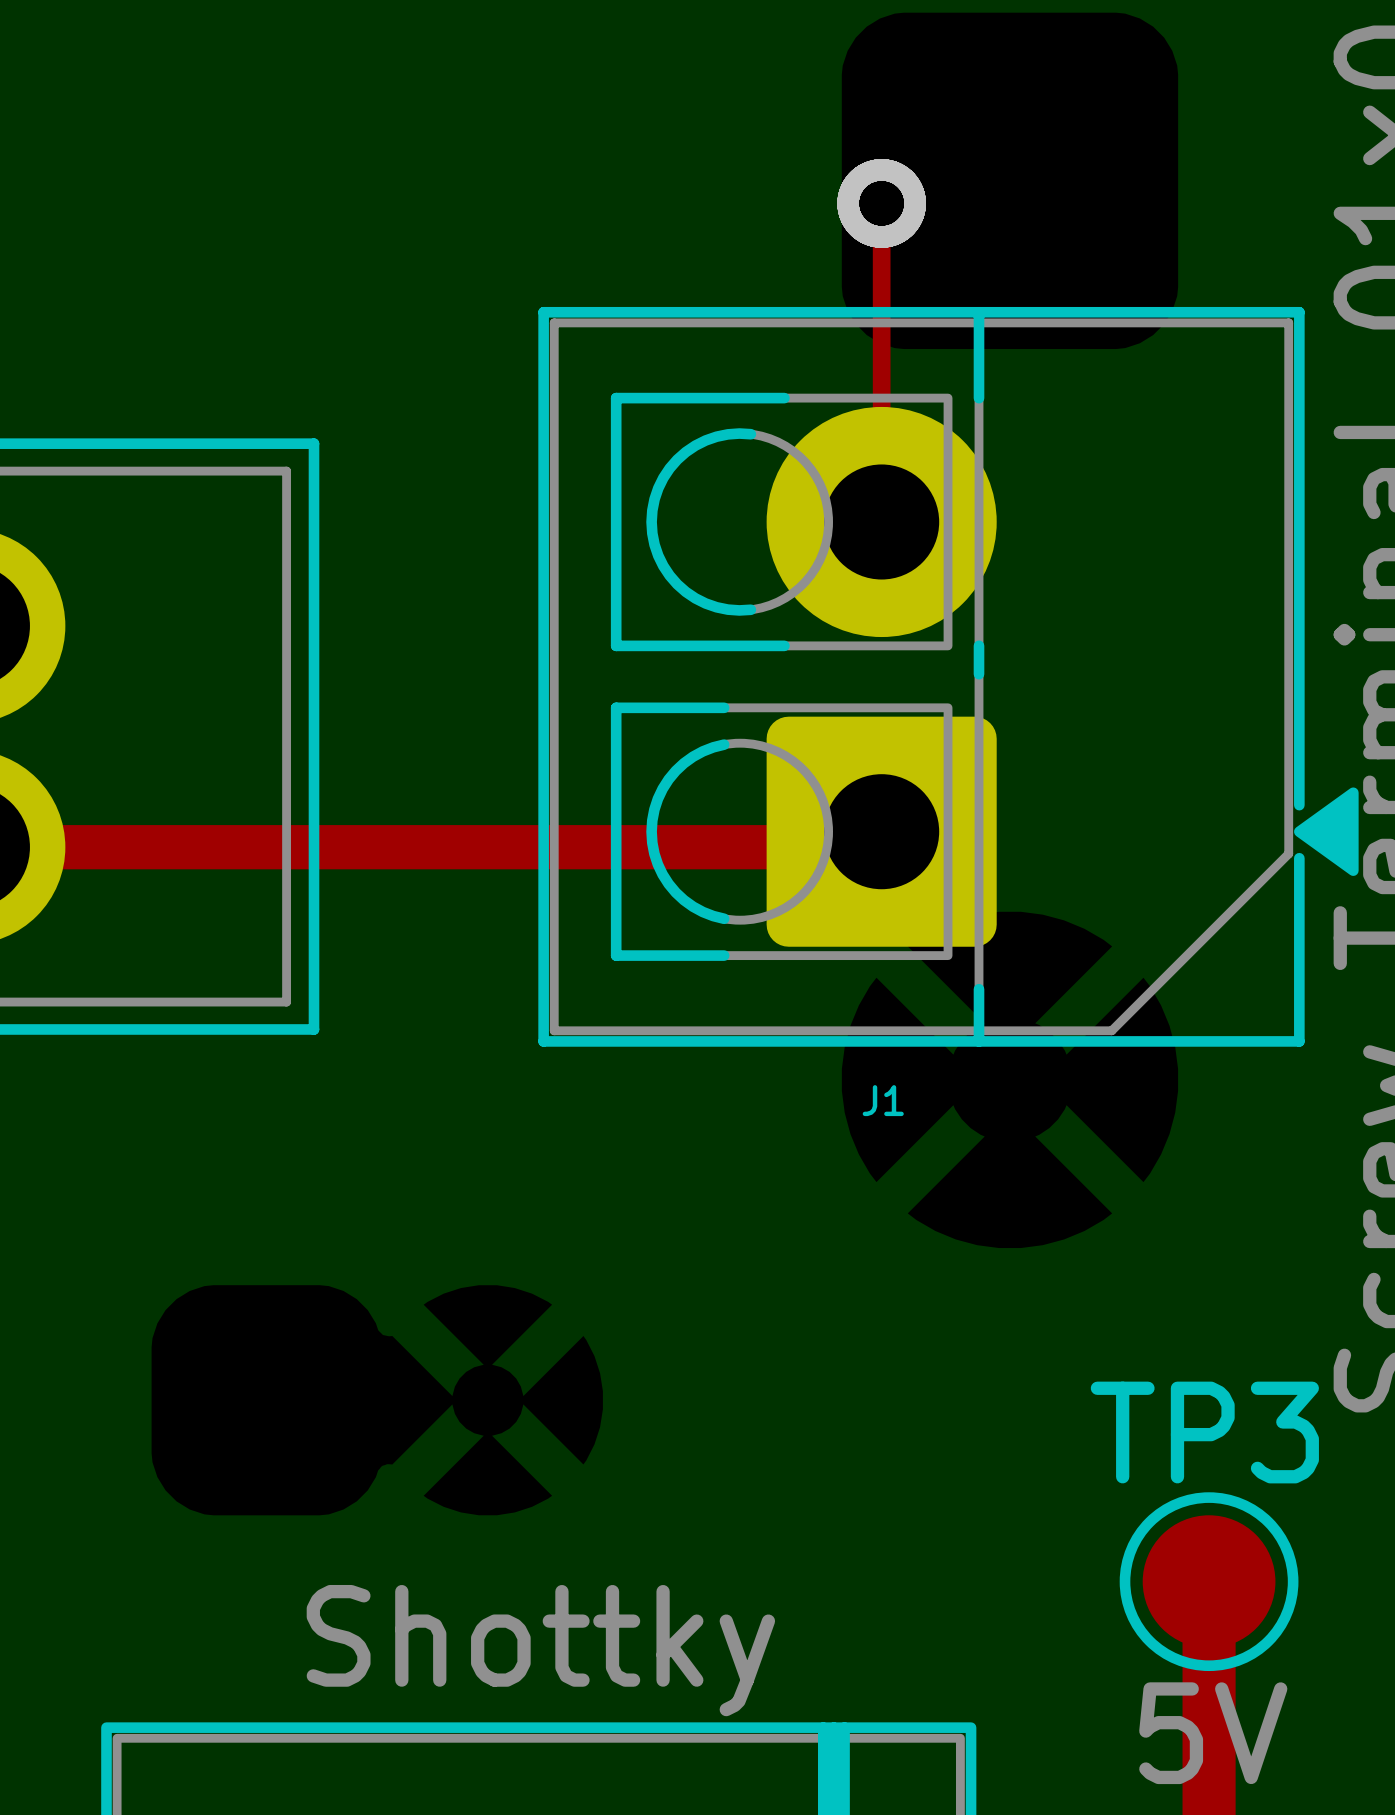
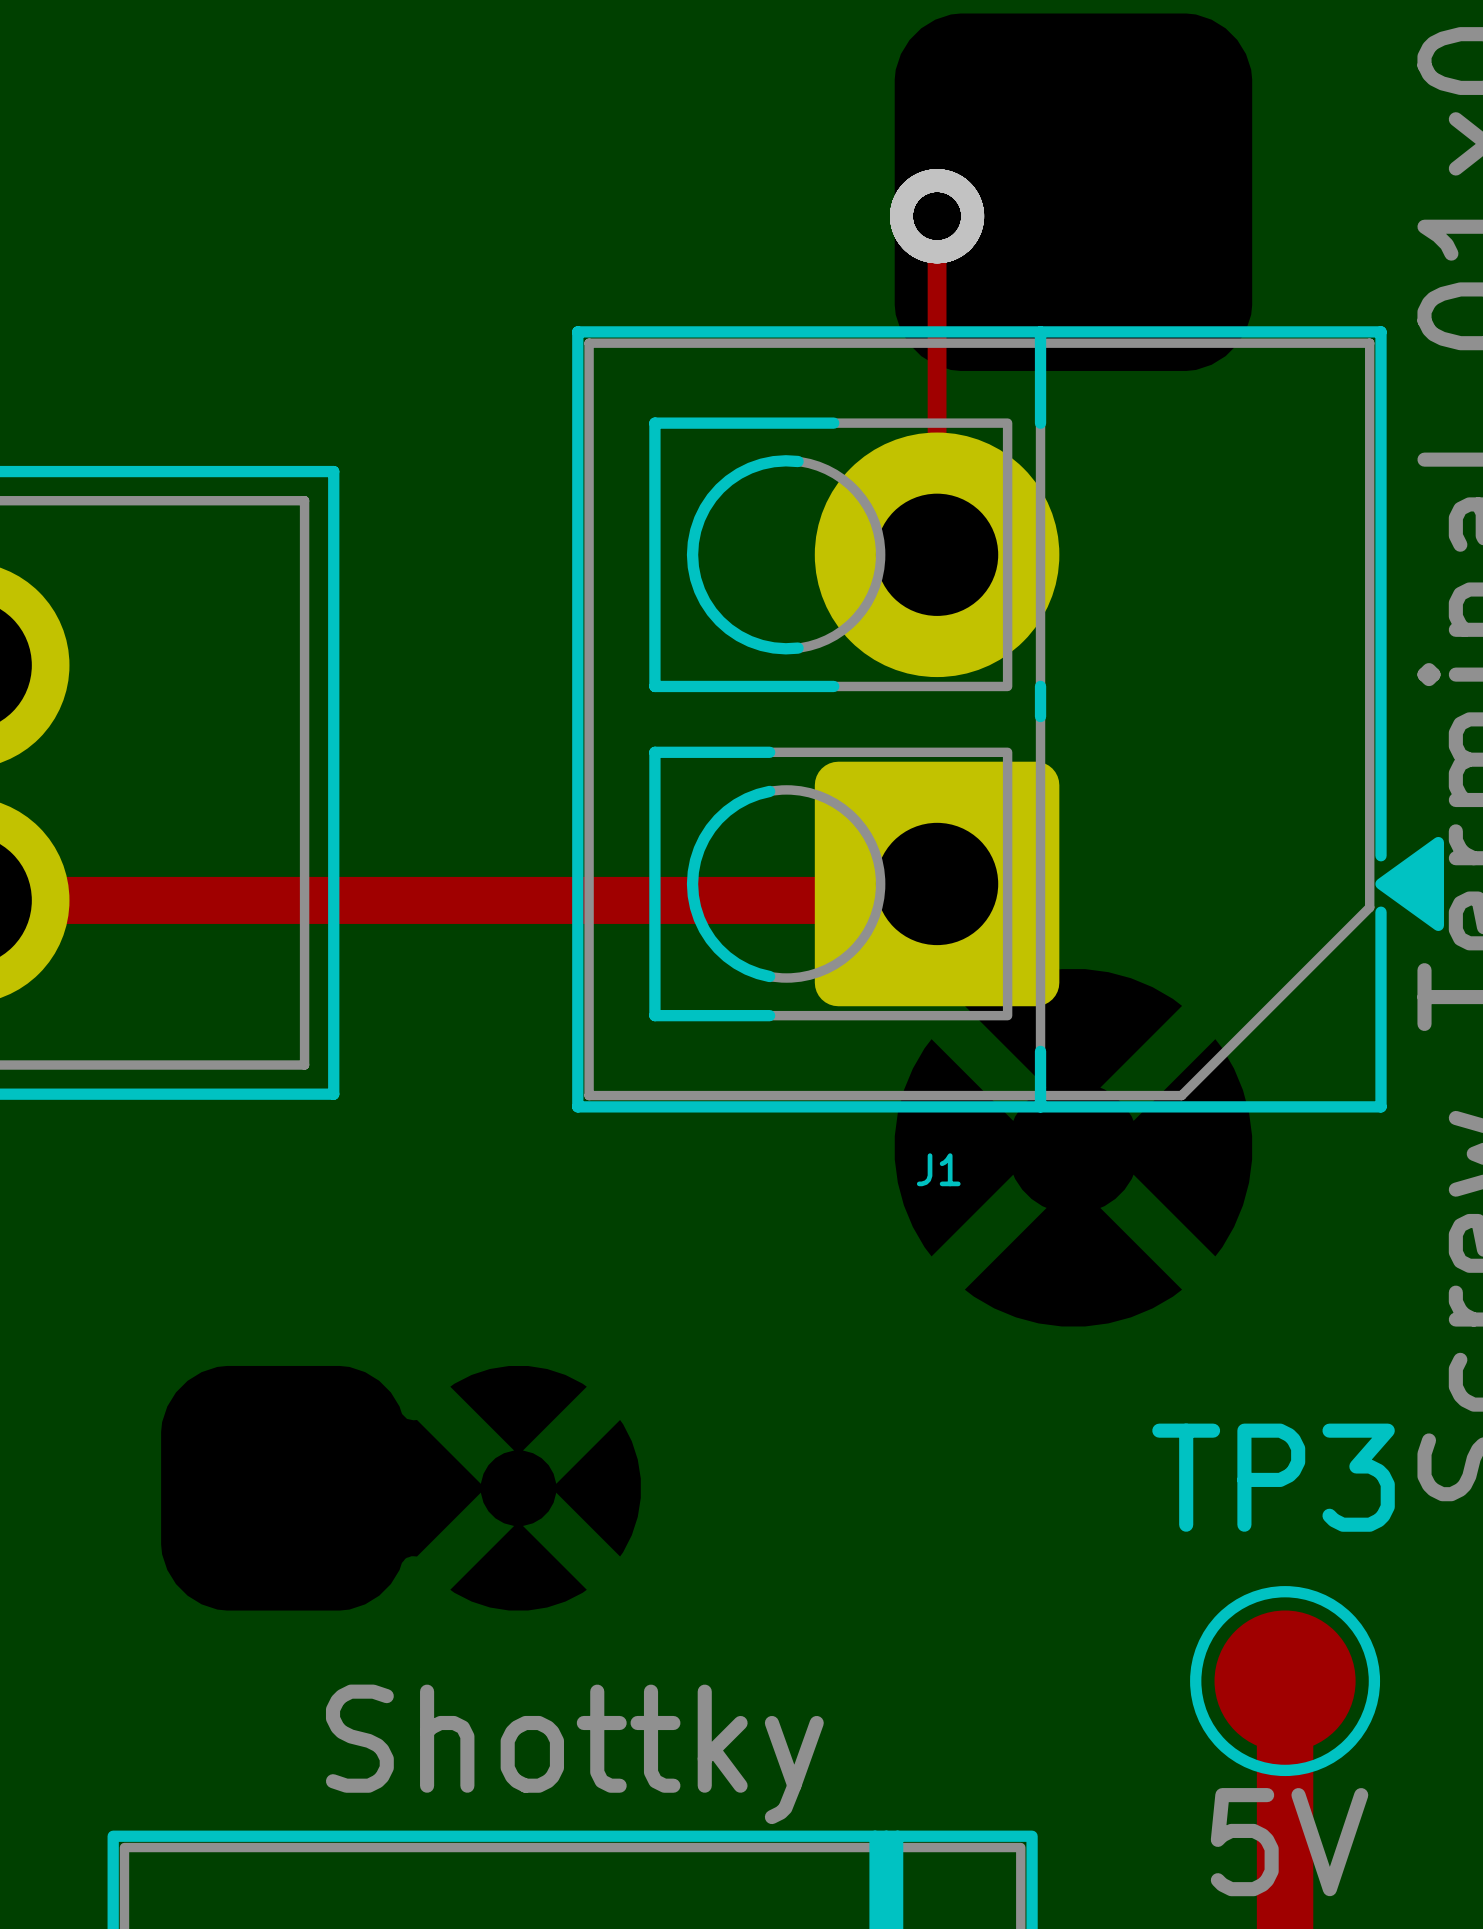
TP3 name position: TP3 (1204, 1432) -> TP3 (1273, 1477)

